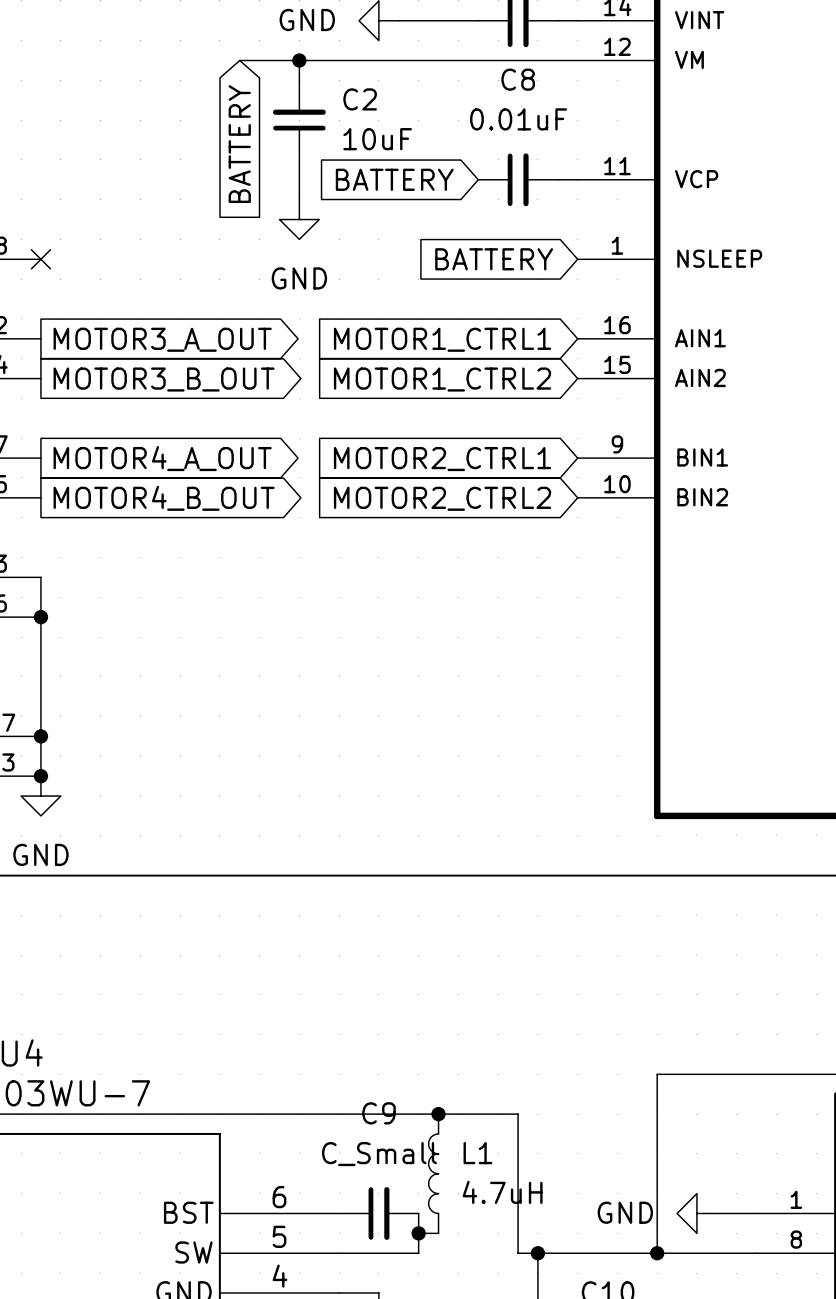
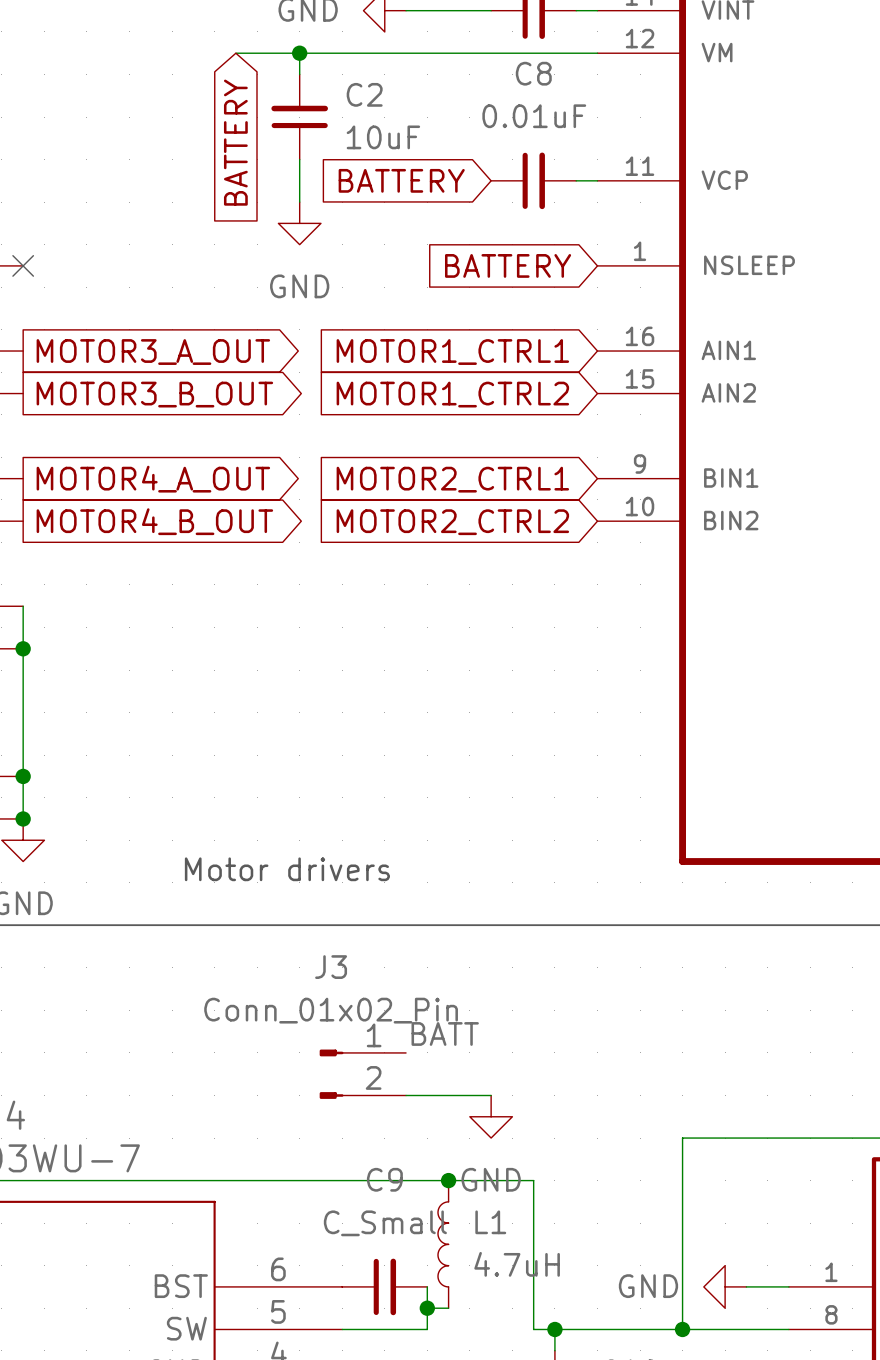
text: none -> Motor drivers (287, 869)
label: none -> BATT (445, 1033)
J3: none -> Conn_01x02_Pin (362, 1074)
wire: none -> (406, 1095) (491, 1095)
power symbol: none -> GND (491, 1116)

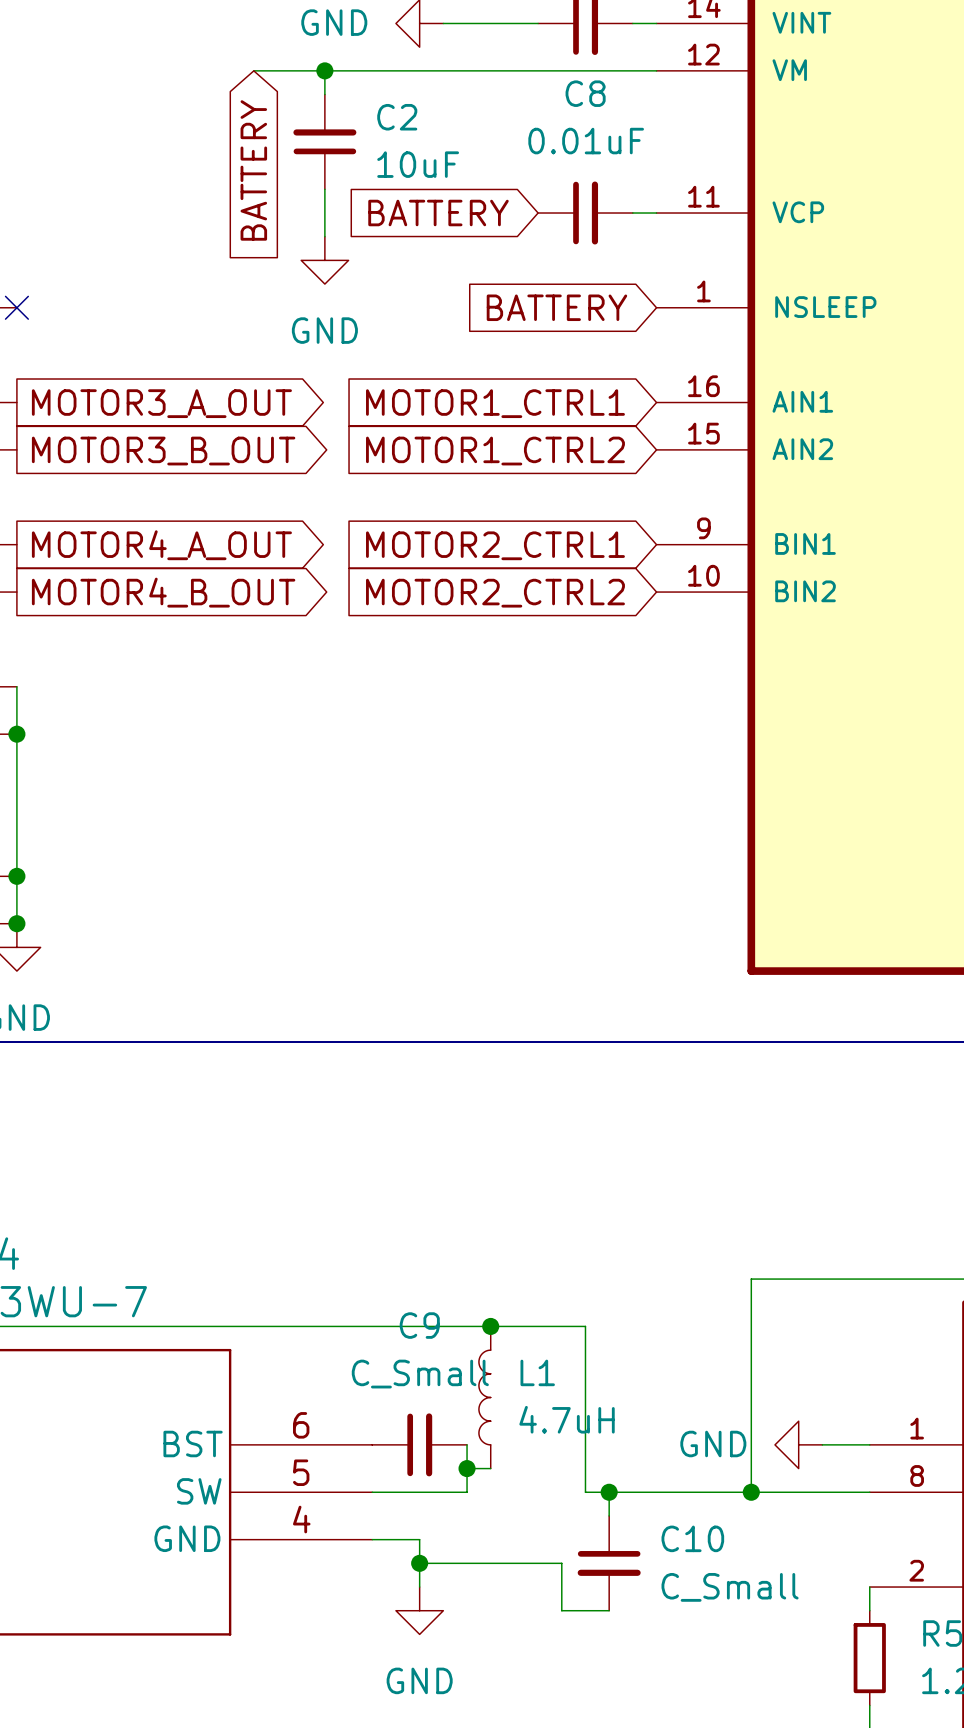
text: Motor drivers (287, 869) -> none
label: BATT (445, 1033) -> none
J3: Conn_01x02_Pin (362, 1074) -> none
wire: (406, 1095) (491, 1095) -> none
power symbol: GND (491, 1116) -> none

